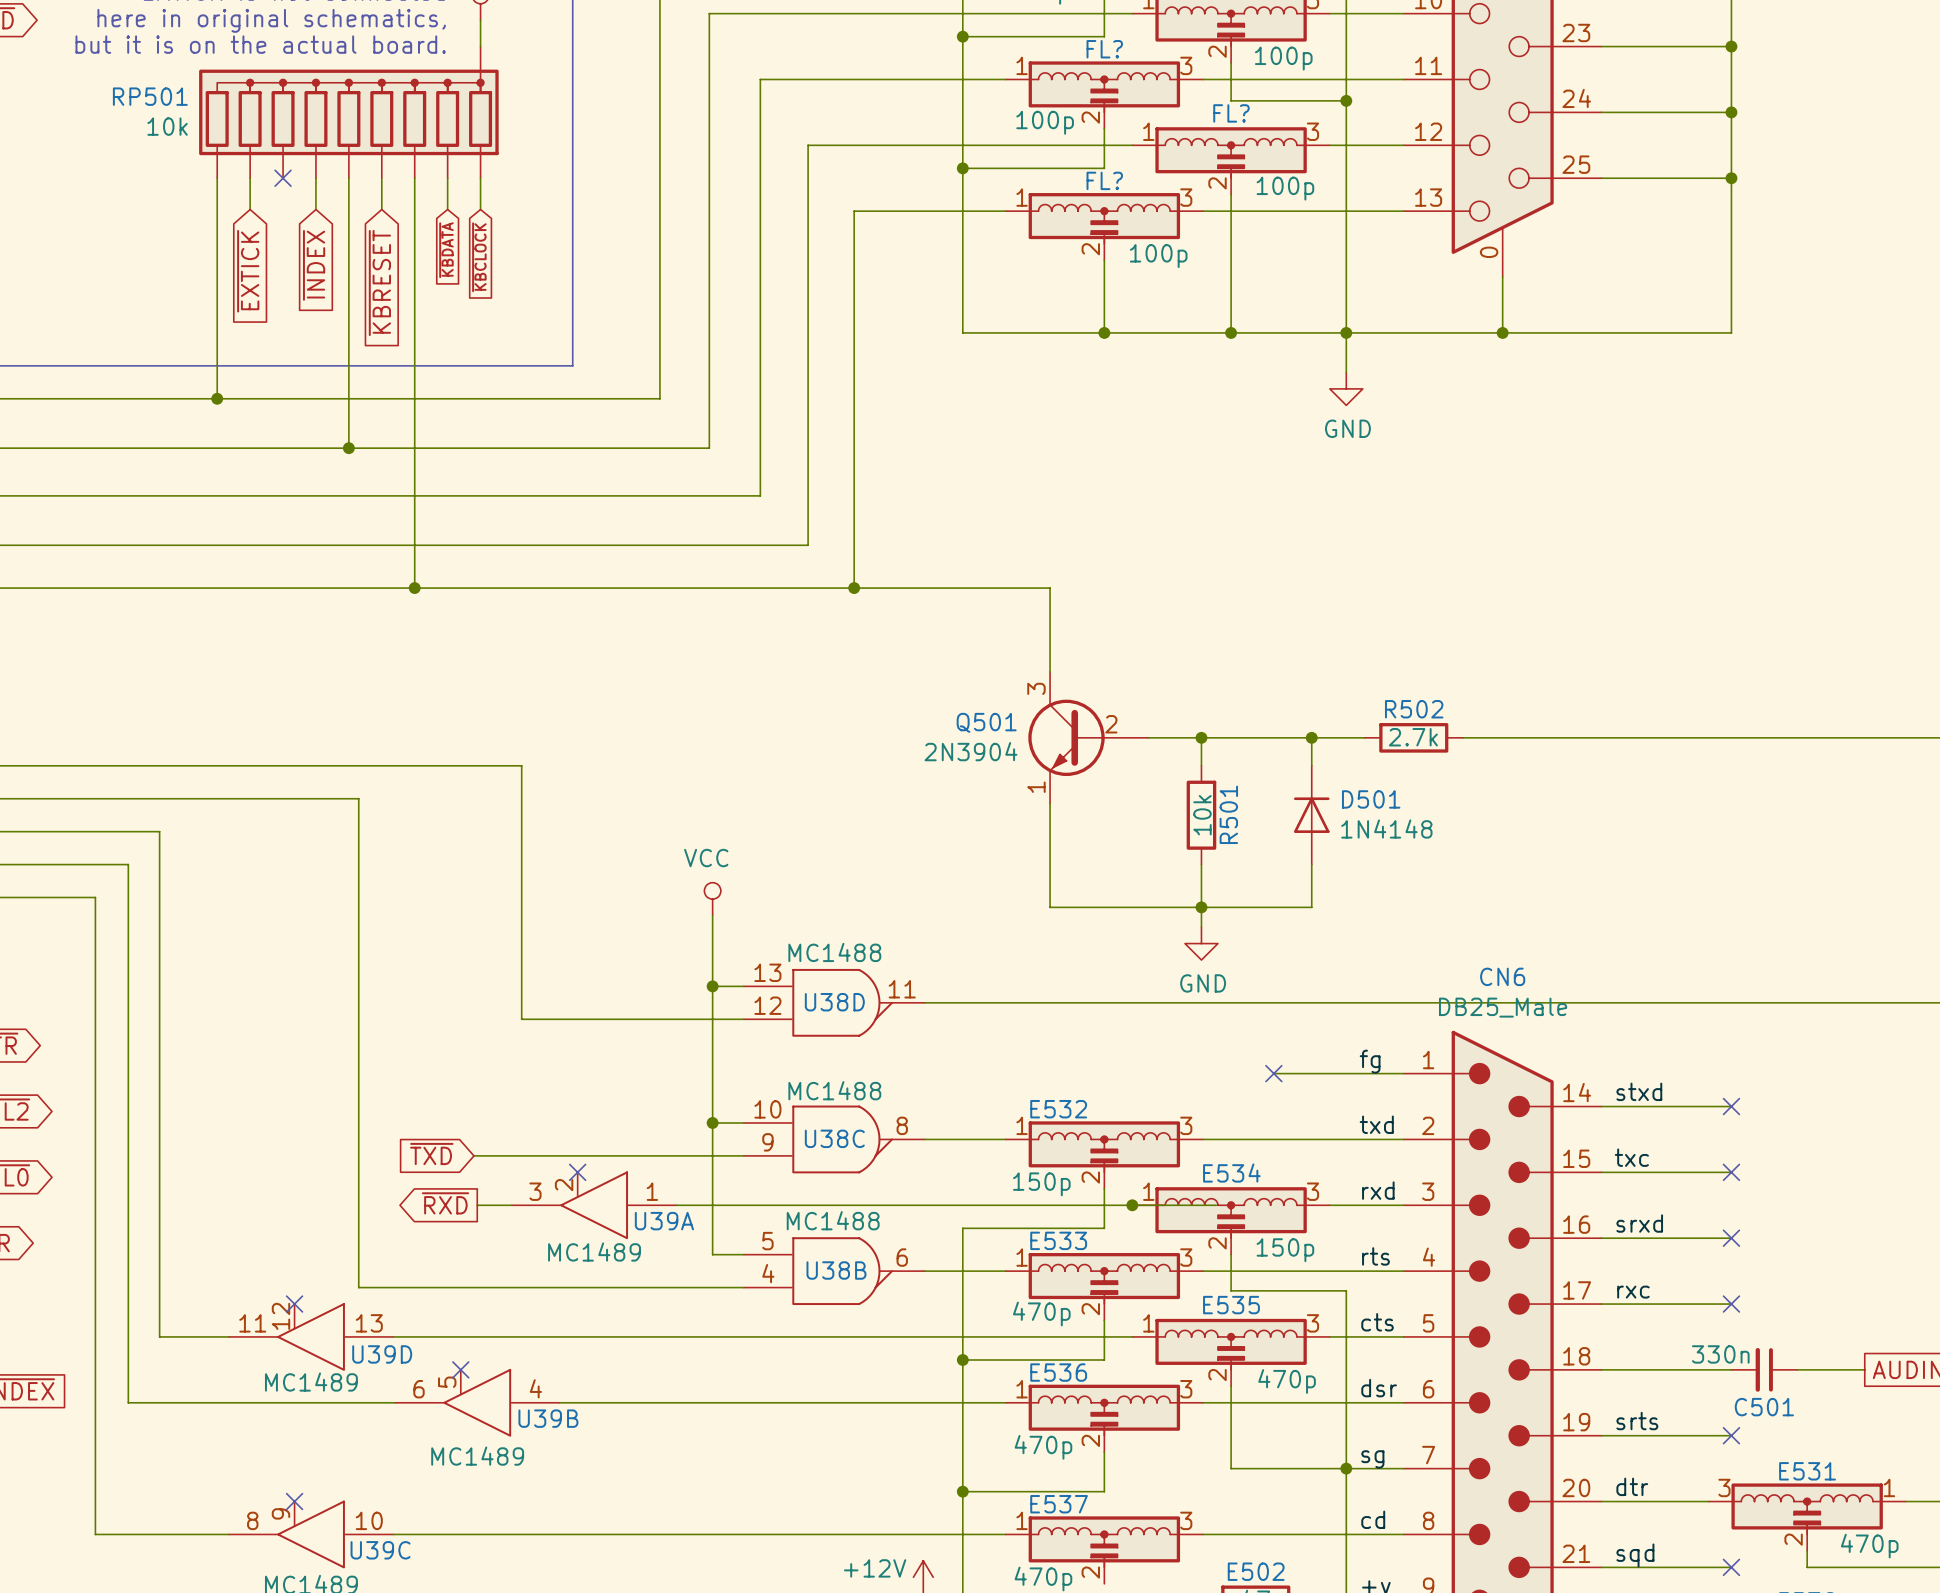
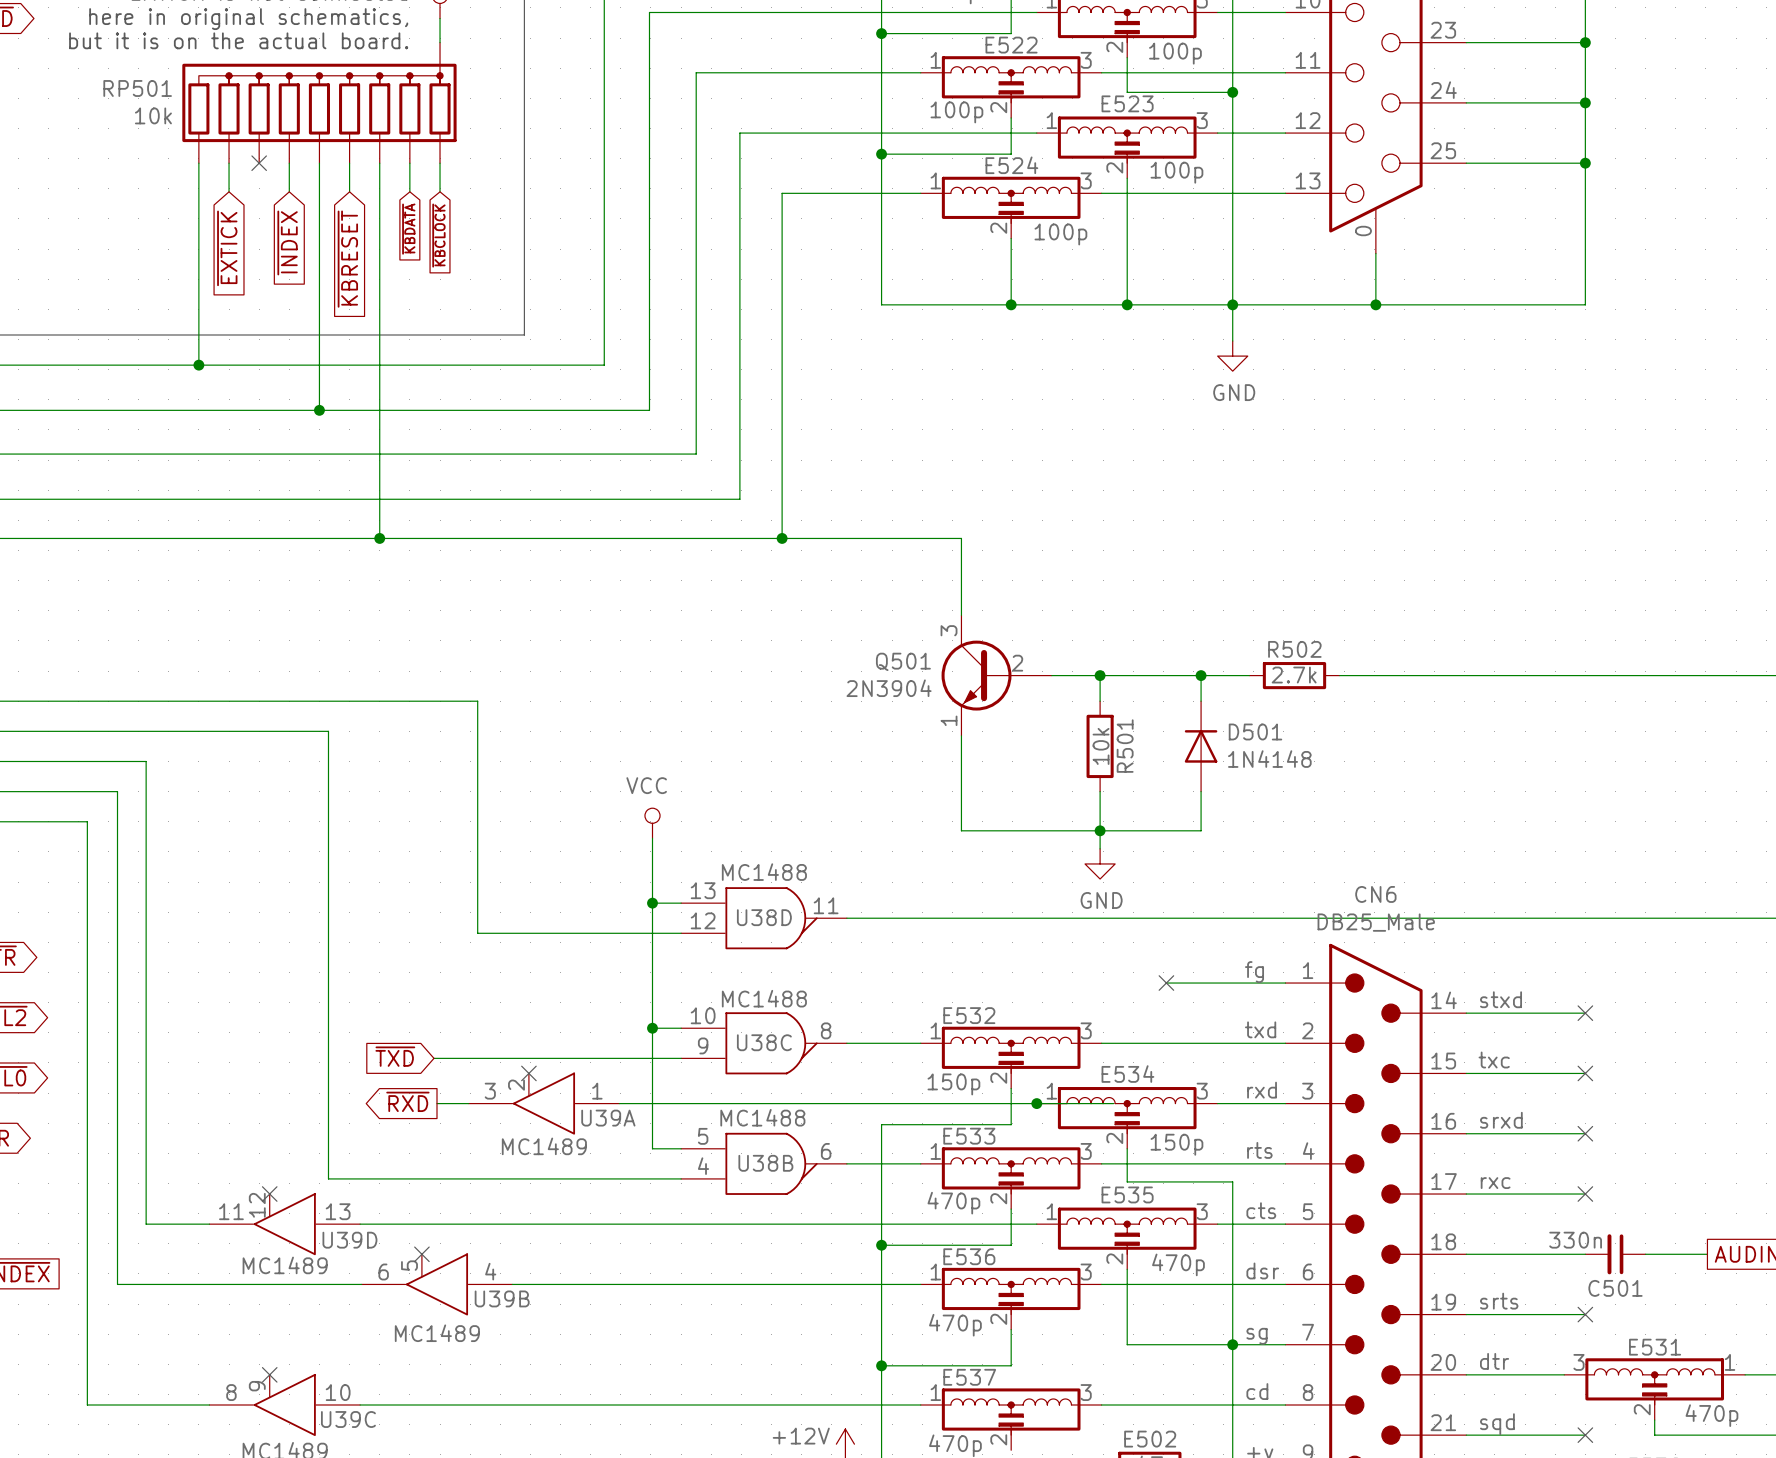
FL? name: FL? (1104, 49) -> E522 (1011, 45)
FL? name: FL? (1231, 113) -> E523 (1127, 103)
FL? name: FL? (1104, 180) -> E524 (1011, 165)

